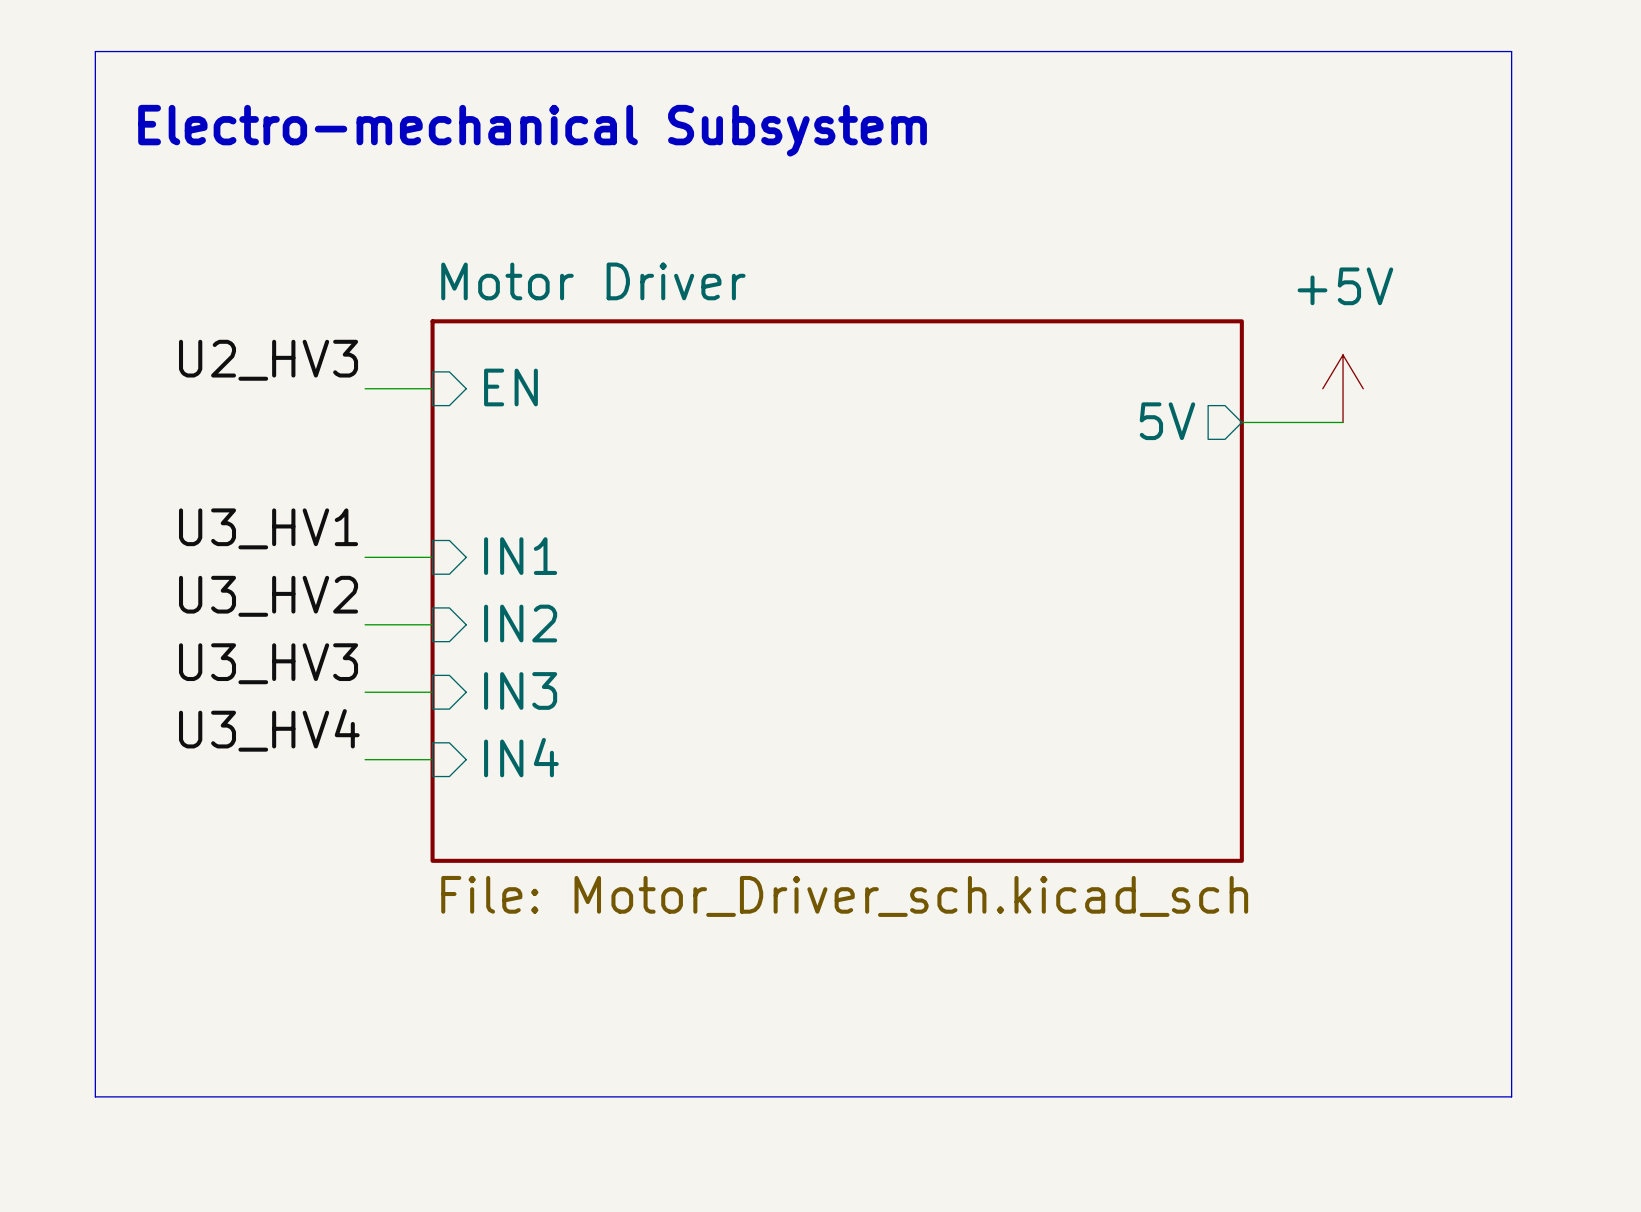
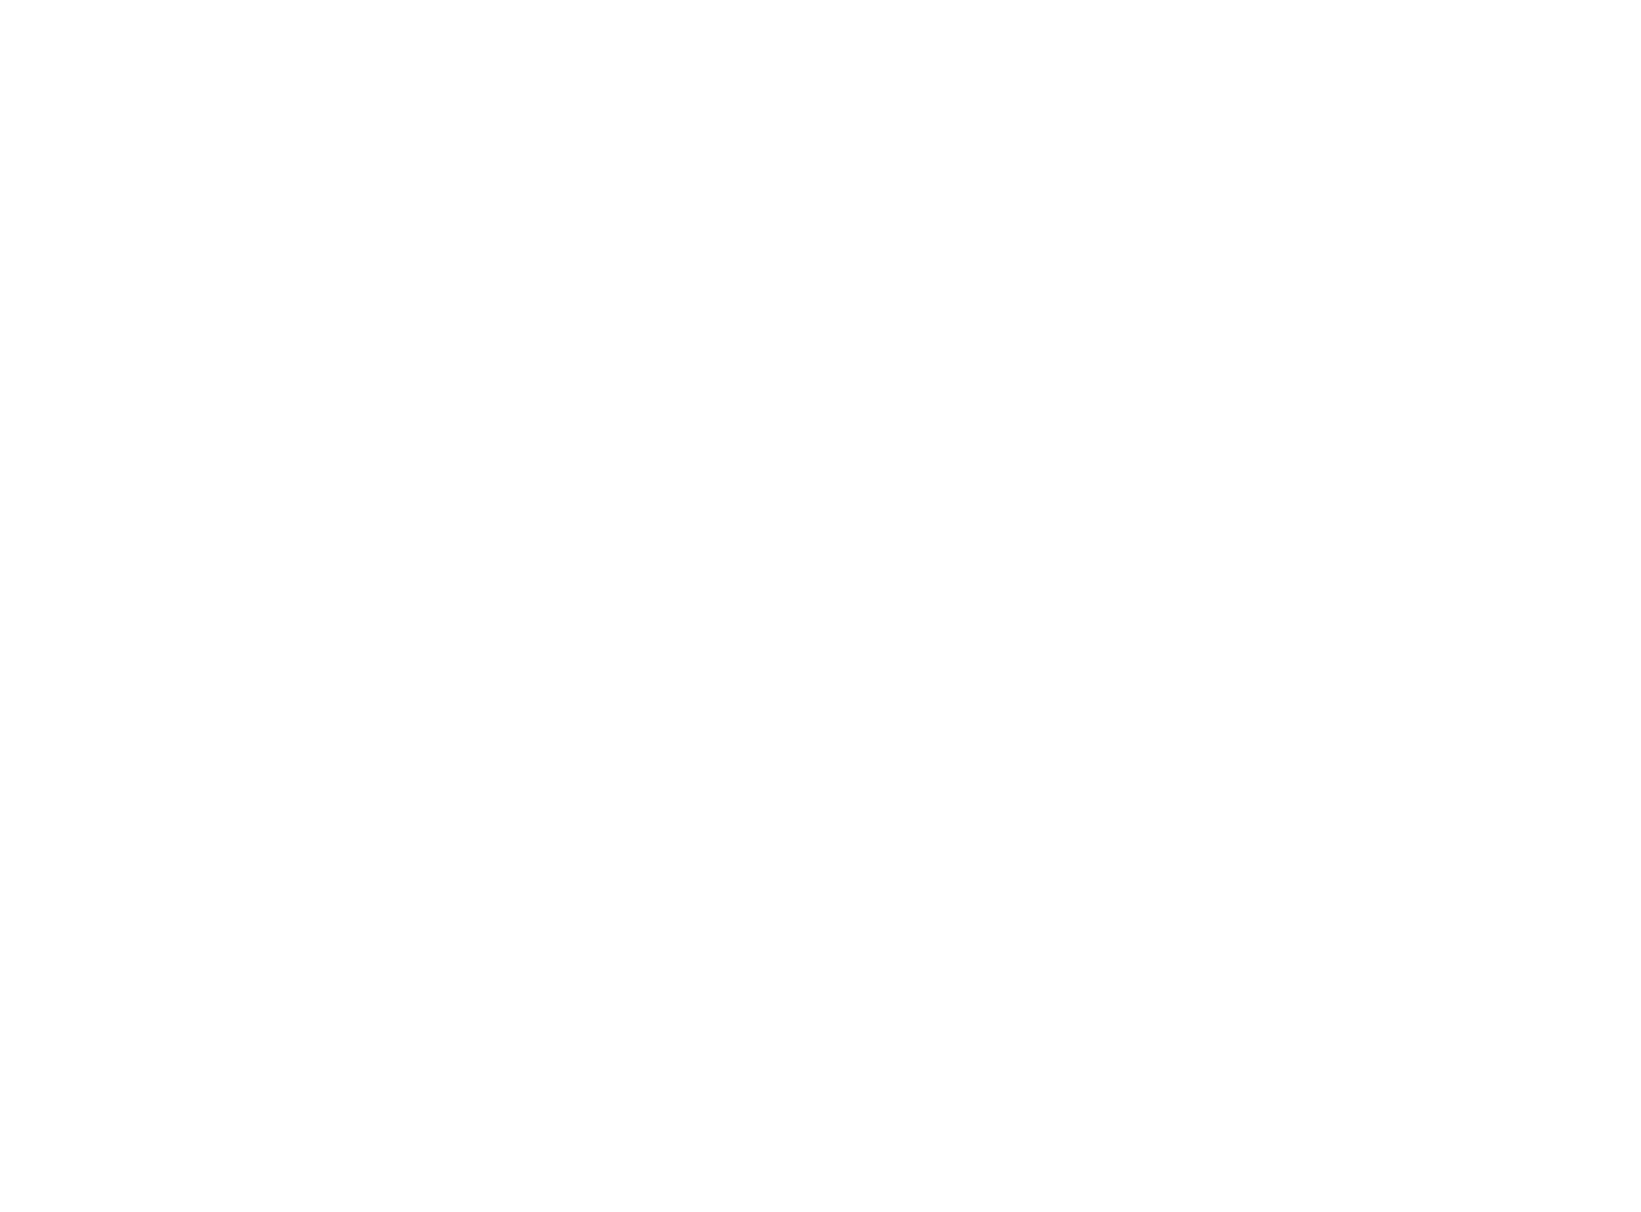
line: (95, 51) (95, 1096) (1511, 1096) (1511, 51) (95, 51) -> none
text: Electro-mechanical Subsystem (532, 130) -> none
label: U2_HV3 (268, 360) -> none
sheet pin: EN (510, 387) -> none
wire: (365, 388) (432, 388) -> none
power symbol: +5V (1343, 388) -> none
sheet pin: 5V (1167, 421) -> none
wire: (1241, 422) (1343, 422) -> none
label: U3_HV1 (268, 528) -> none
sheet pin: IN1 (520, 556) -> none
wire: (365, 557) (432, 557) -> none
sheet Motor Driver: File: Motor_Driver_sch.kicad_sch (837, 591) -> none
label: U3_HV2 (268, 596) -> none
sheet pin: IN2 (520, 623) -> none
wire: (365, 624) (432, 624) -> none
label: U3_HV3 (268, 663) -> none
sheet pin: IN3 (520, 690) -> none
wire: (365, 692) (432, 692) -> none
label: U3_HV4 (269, 730) -> none
sheet pin: IN4 (521, 757) -> none
wire: (365, 759) (432, 759) -> none

